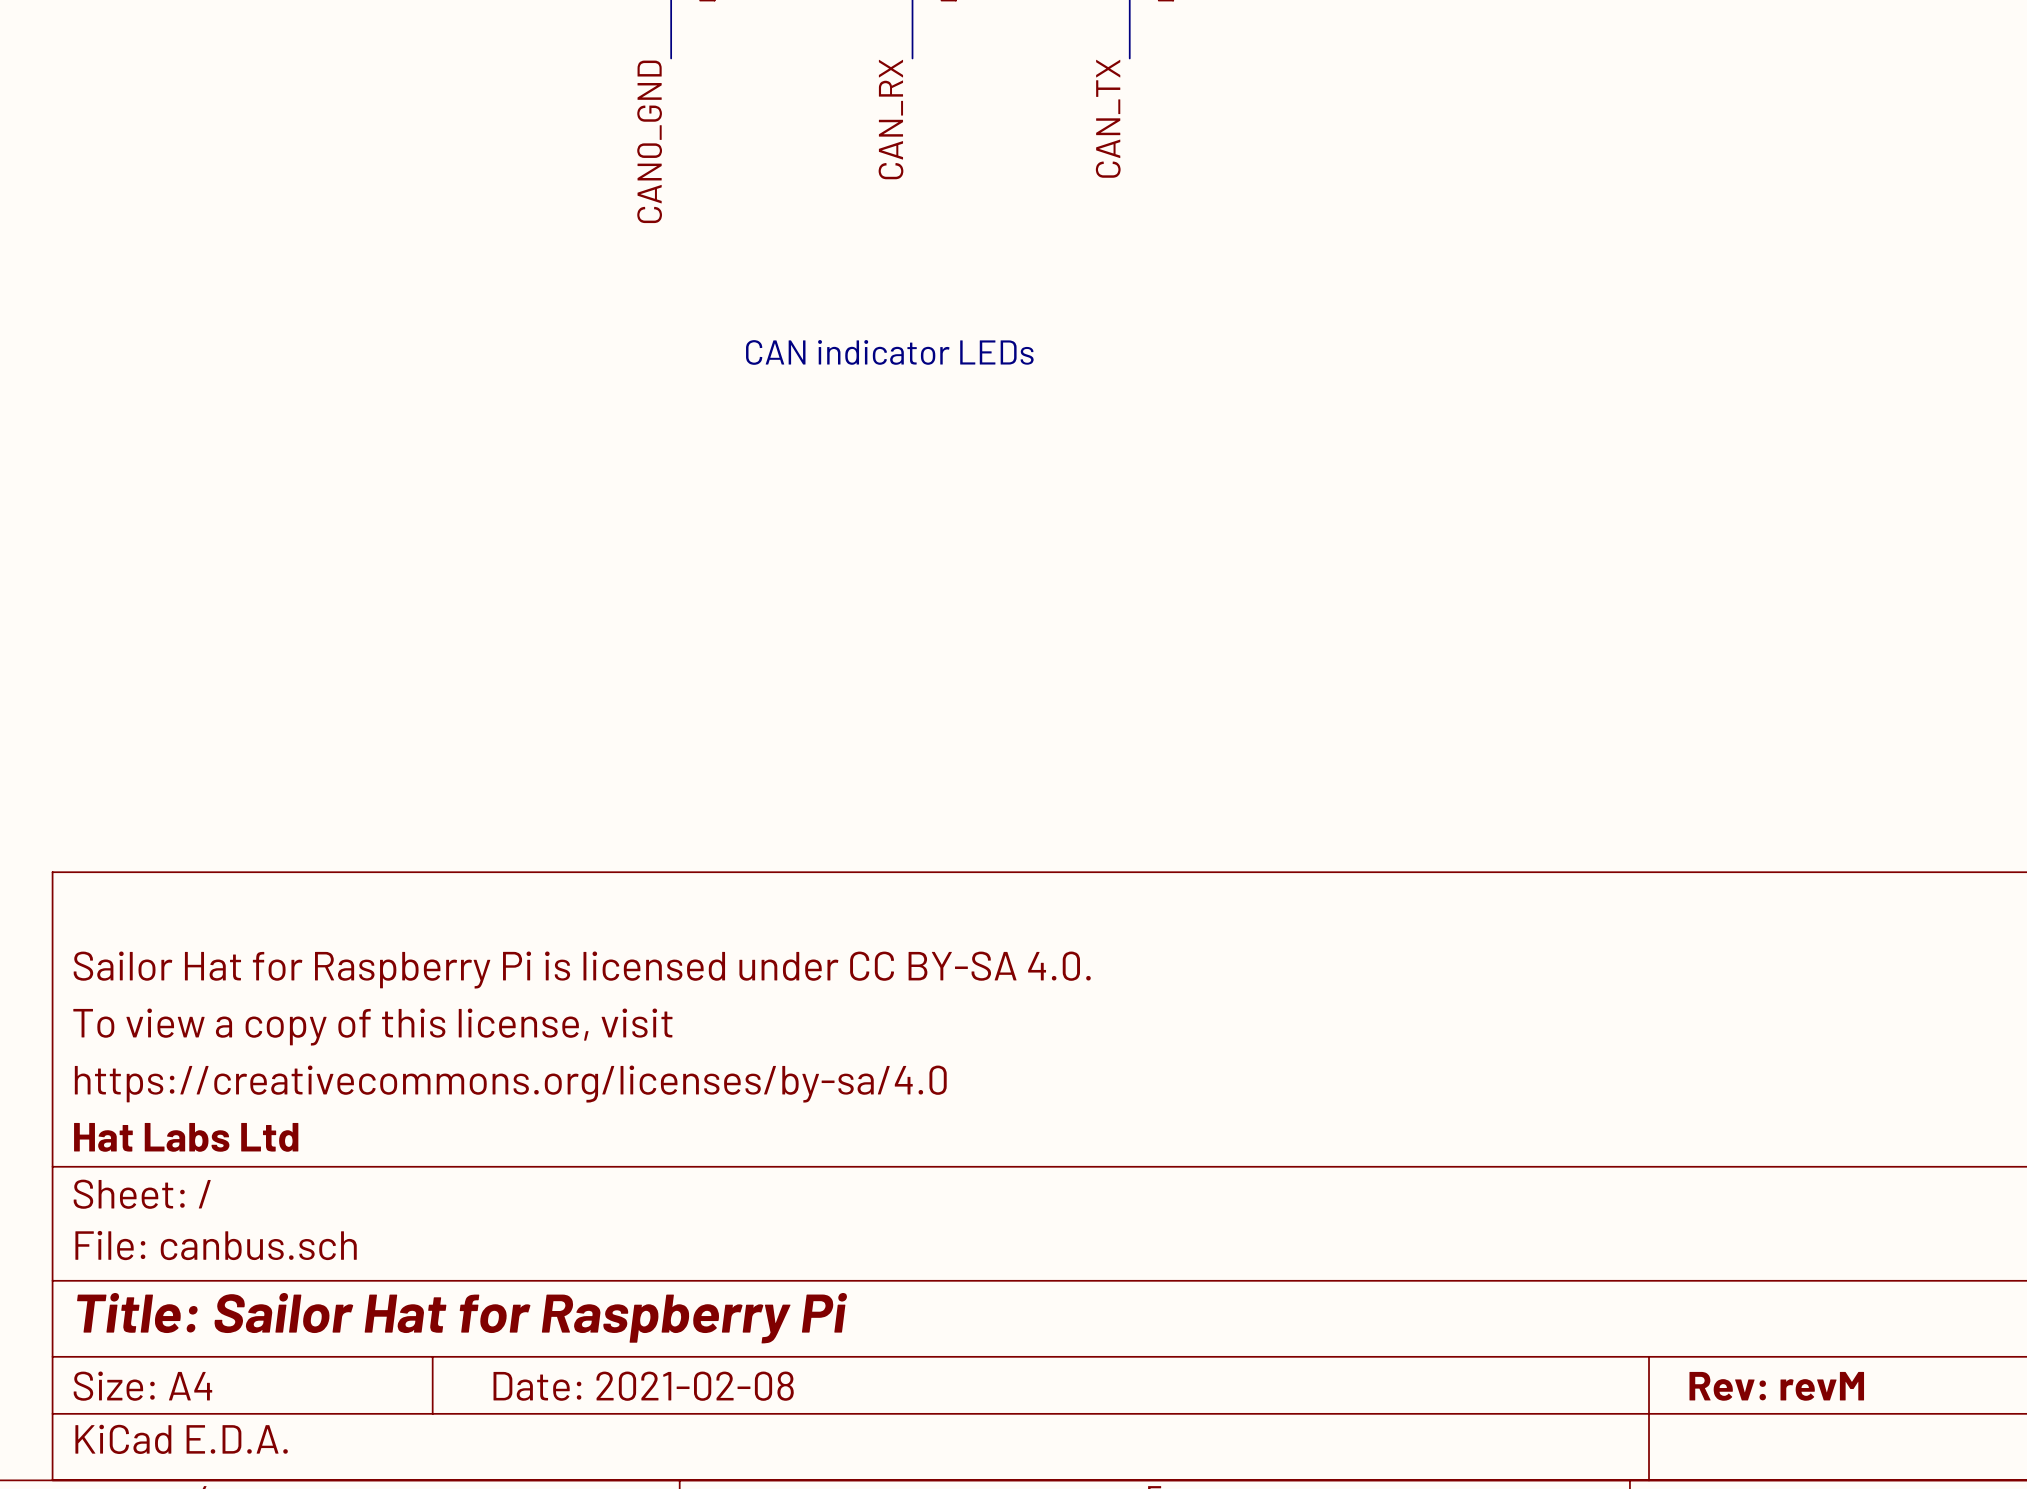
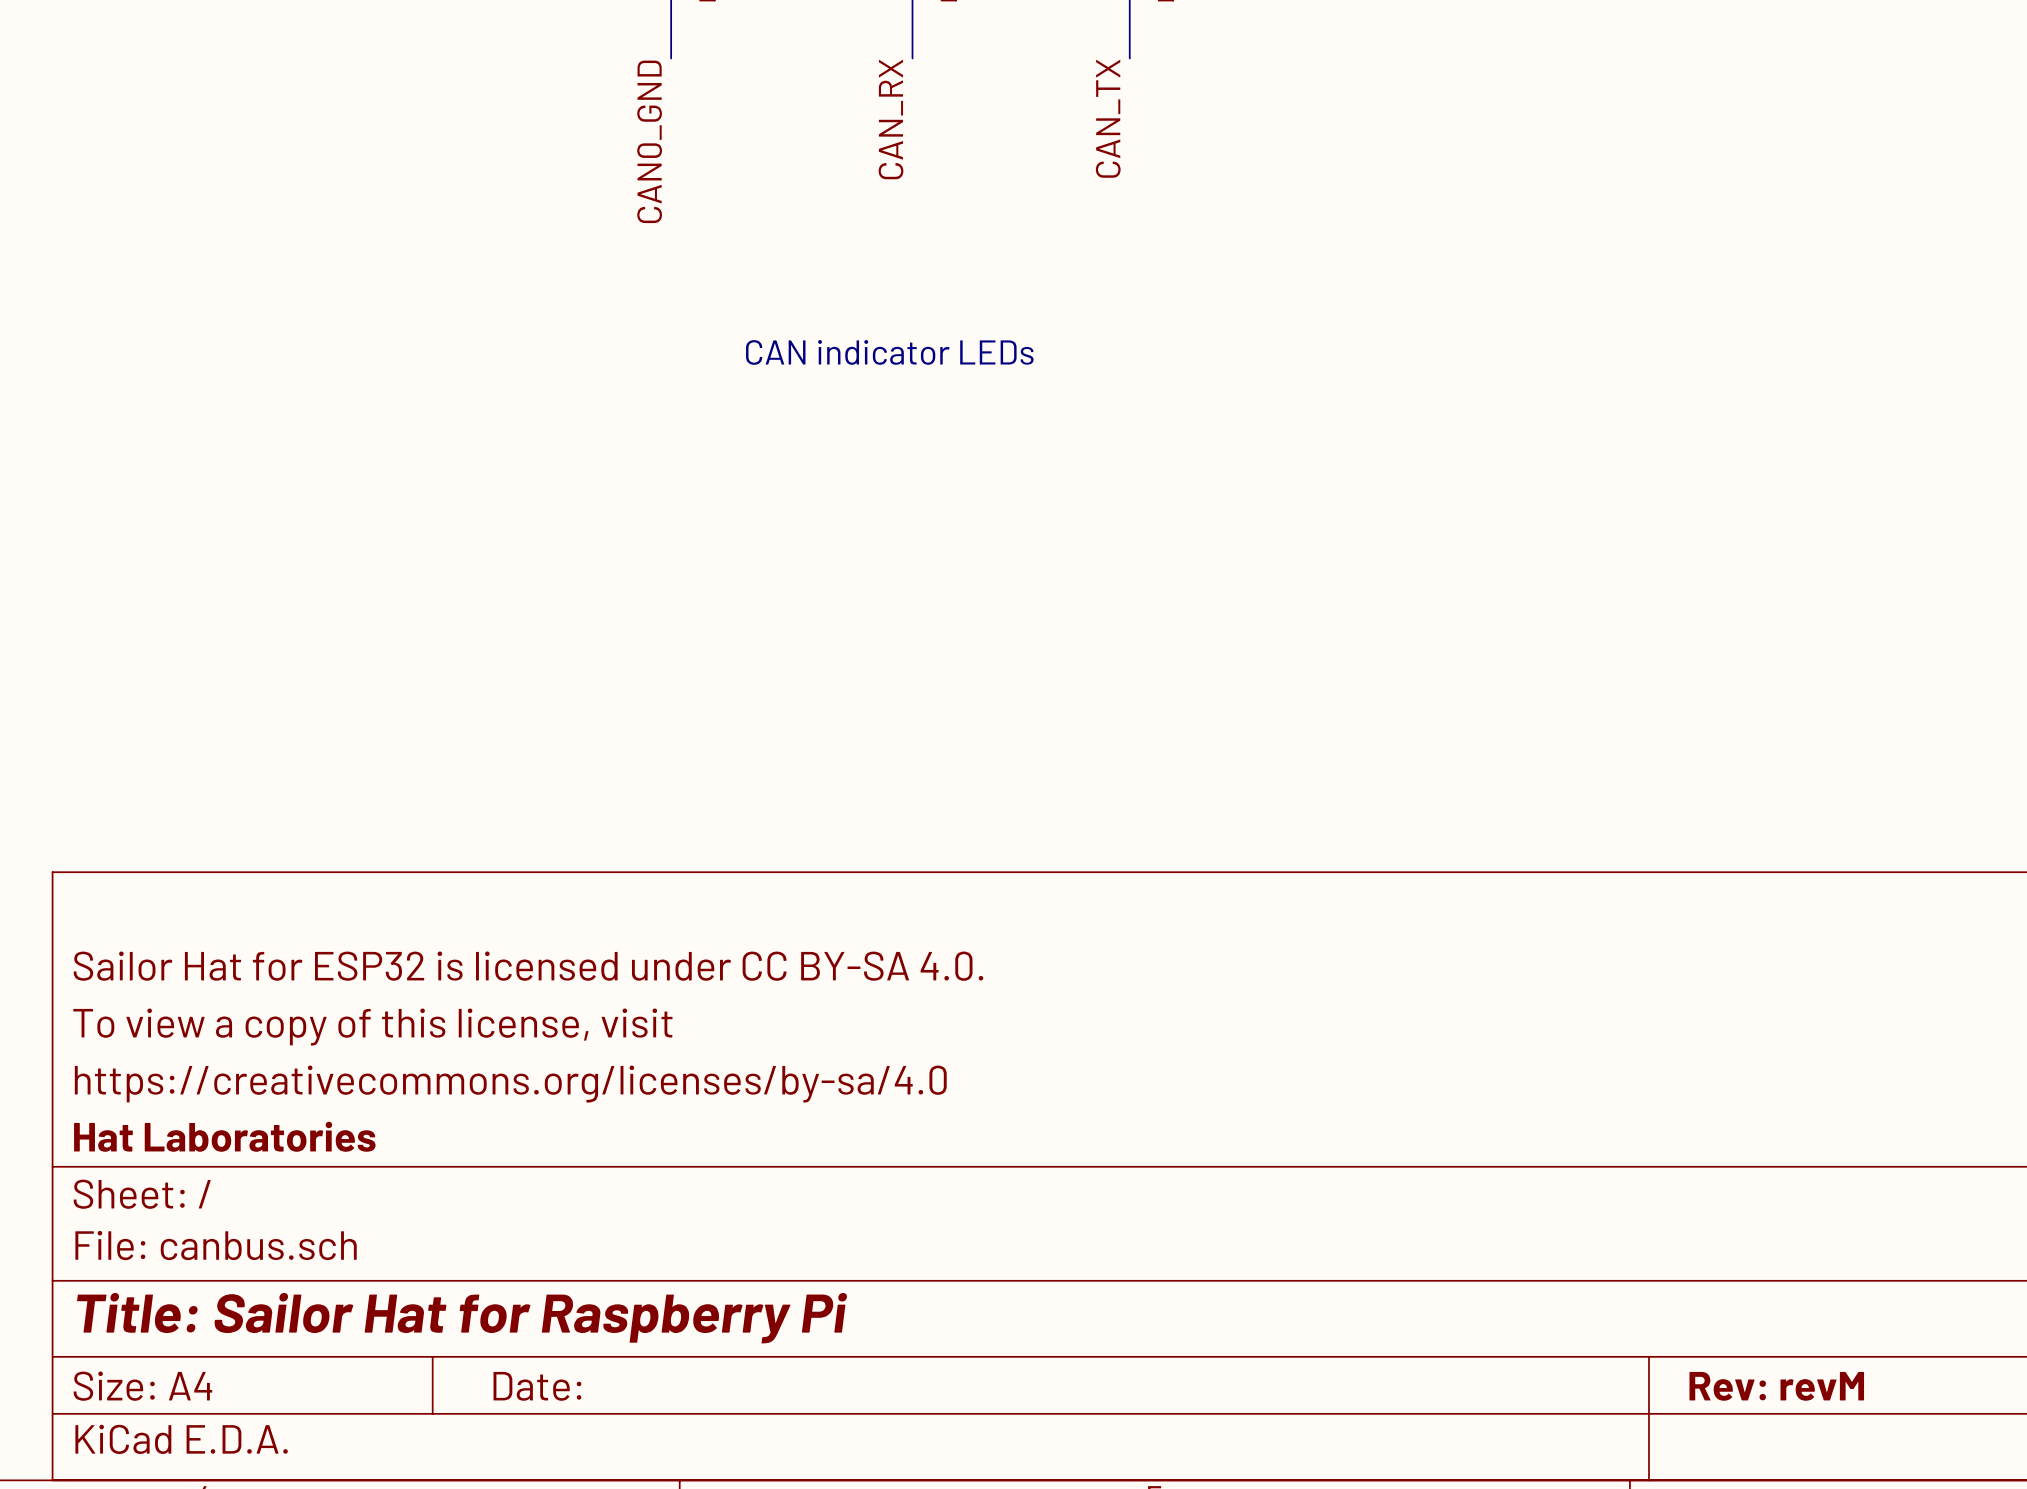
title block: Sailor Hat for Raspberry Pi is licensed under CC BY-SA 4.0. (582, 970) -> Sailor Hat for ESP32 is licensed under CC BY-SA 4.0. (528, 966)
title block: Hat Labs Ltd (186, 1137) -> Hat Laboratories (224, 1136)
title block: Date: 2021-02-08 (643, 1386) -> Date: (537, 1386)

